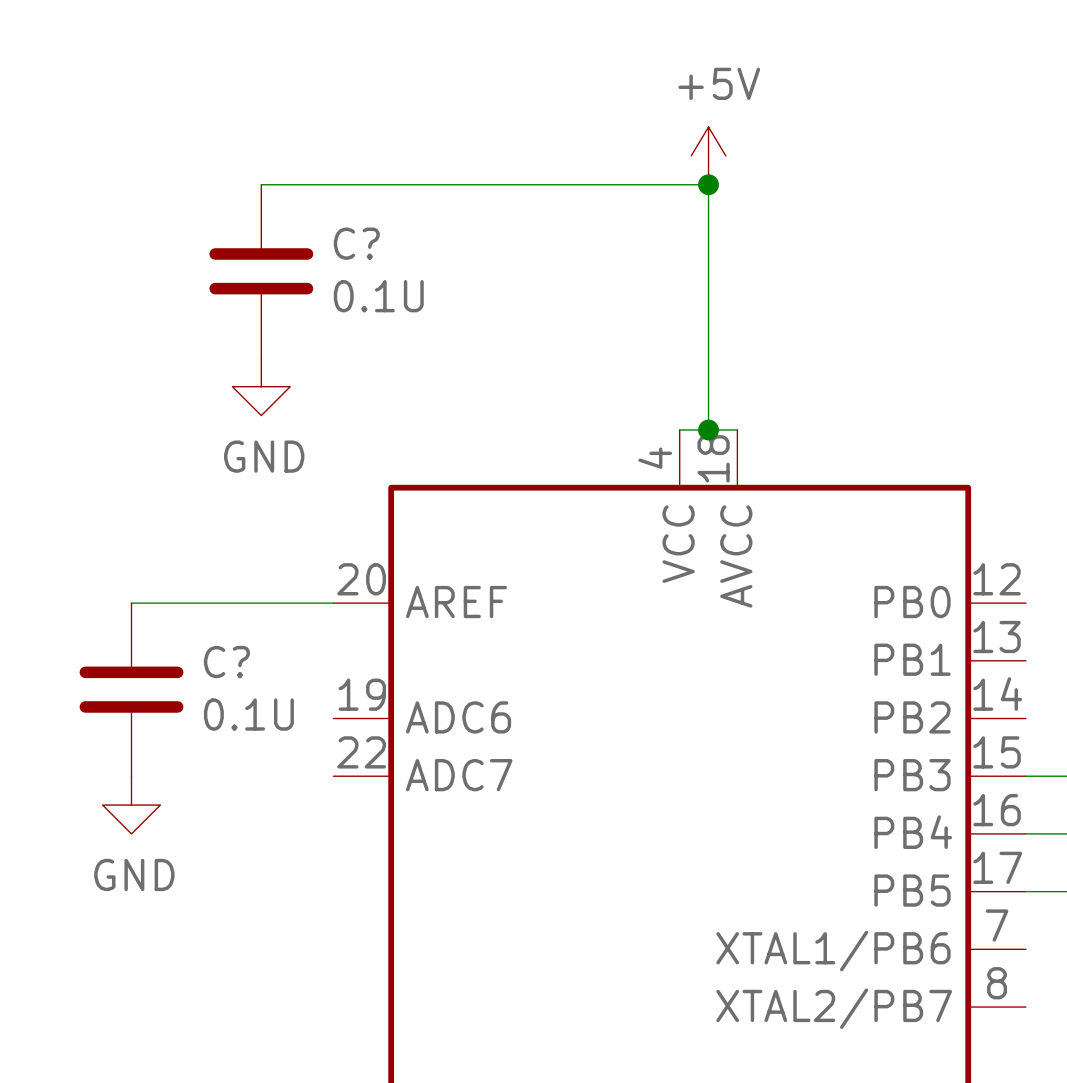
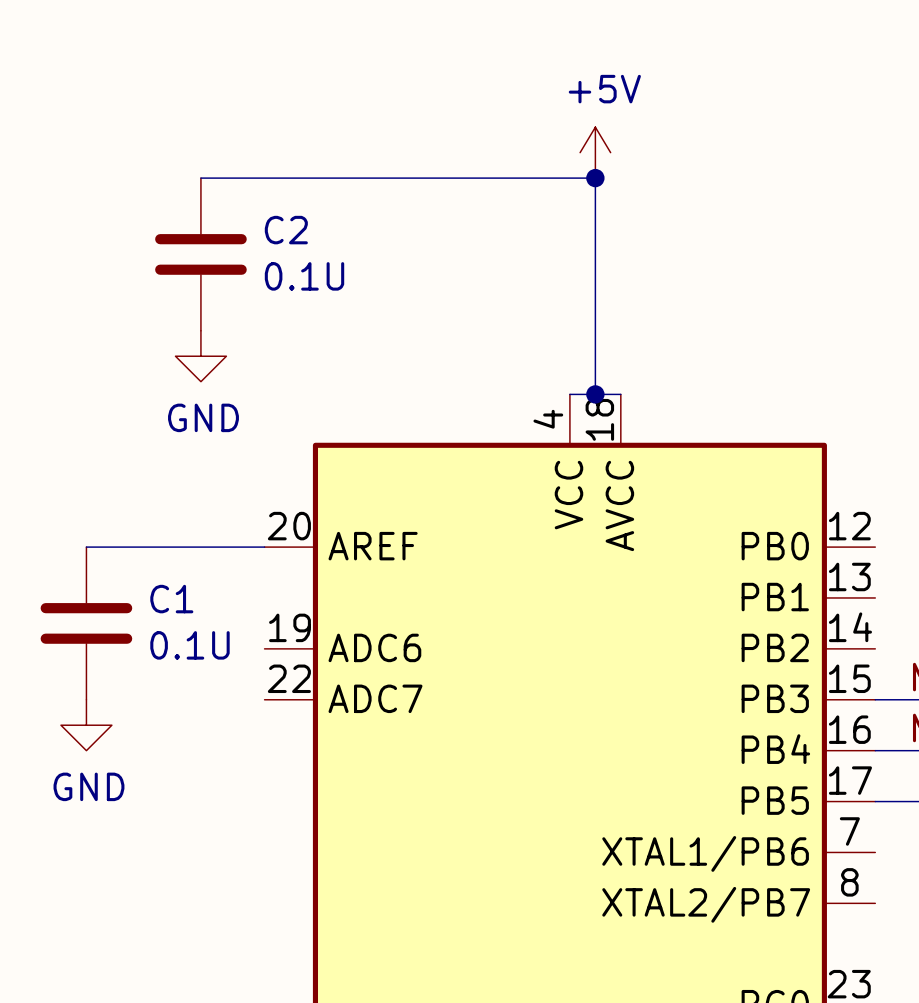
C? name: C? (356, 243) -> C2 (286, 230)
C? name: C? (226, 662) -> C1 (171, 599)

